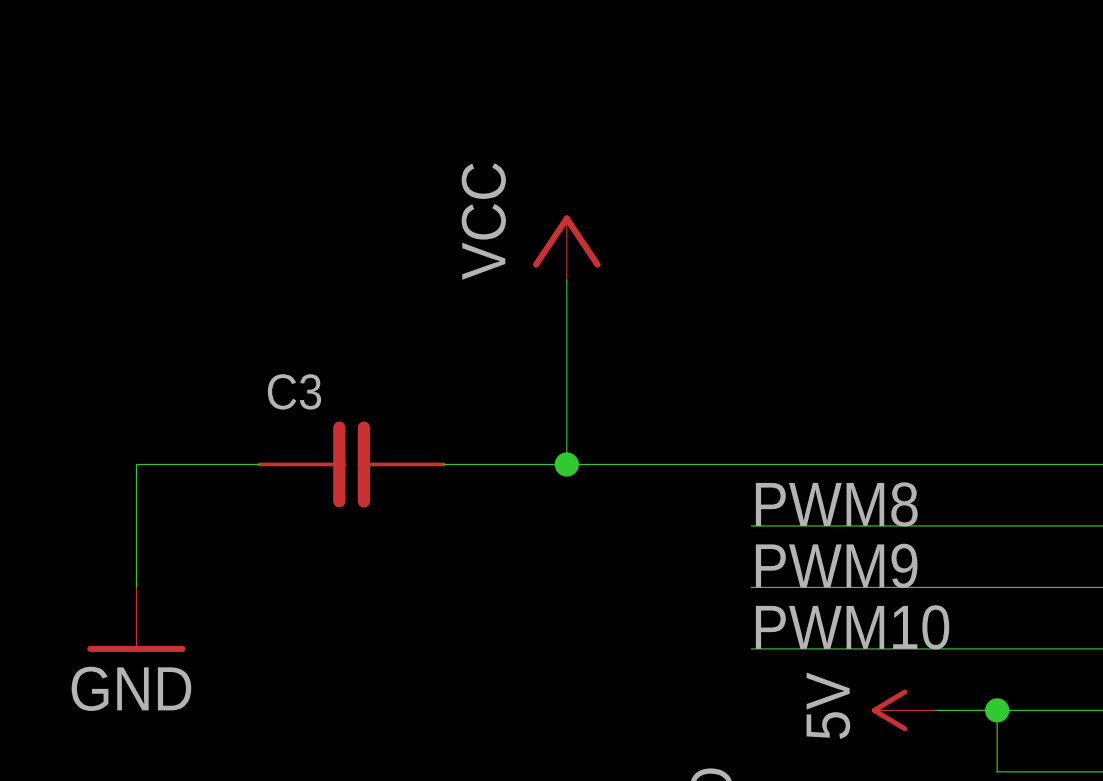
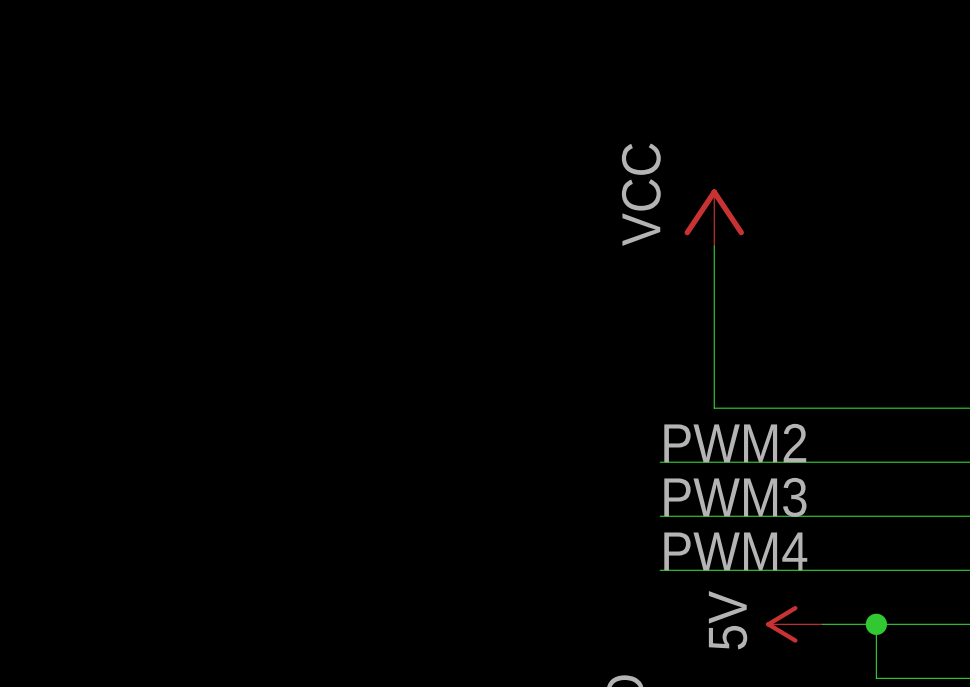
power symbol position: VCC (566, 247) -> VCC (714, 217)
wire: (566, 280) (566, 464) -> none
wire: (259, 464) (136, 464) (136, 587) -> none
C3: (351, 464) -> none
wire: (443, 464) (812, 464) -> (714, 246) (714, 408)
junction: (566, 464) -> none
label: PWM8 (836, 504) -> PWM2 (735, 443)
label: PWM9 (836, 565) -> PWM3 (735, 497)
power symbol: GND (136, 619) -> none
label: PWM10 (852, 627) -> PWM4 (735, 551)

